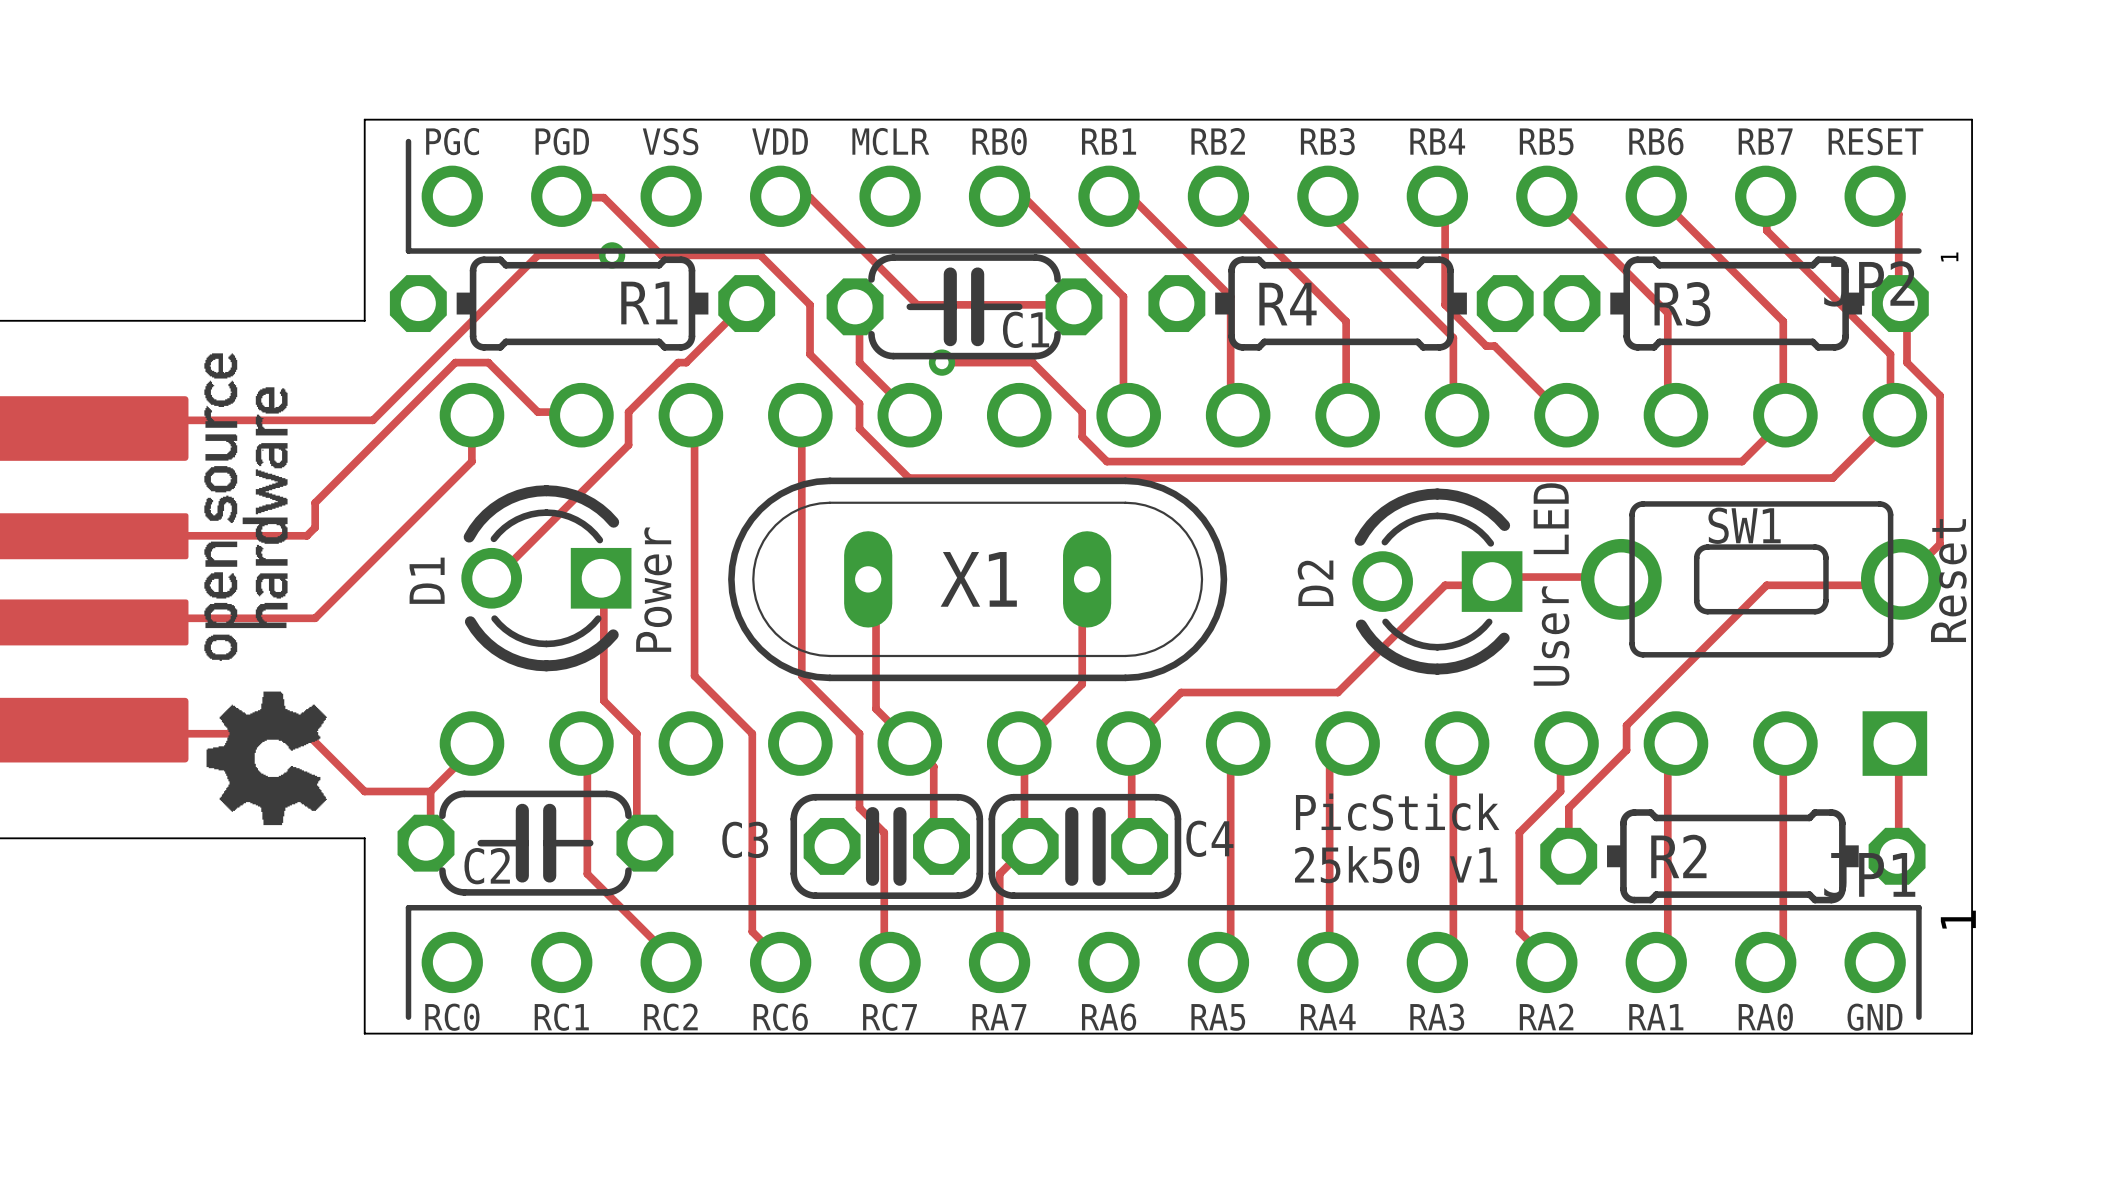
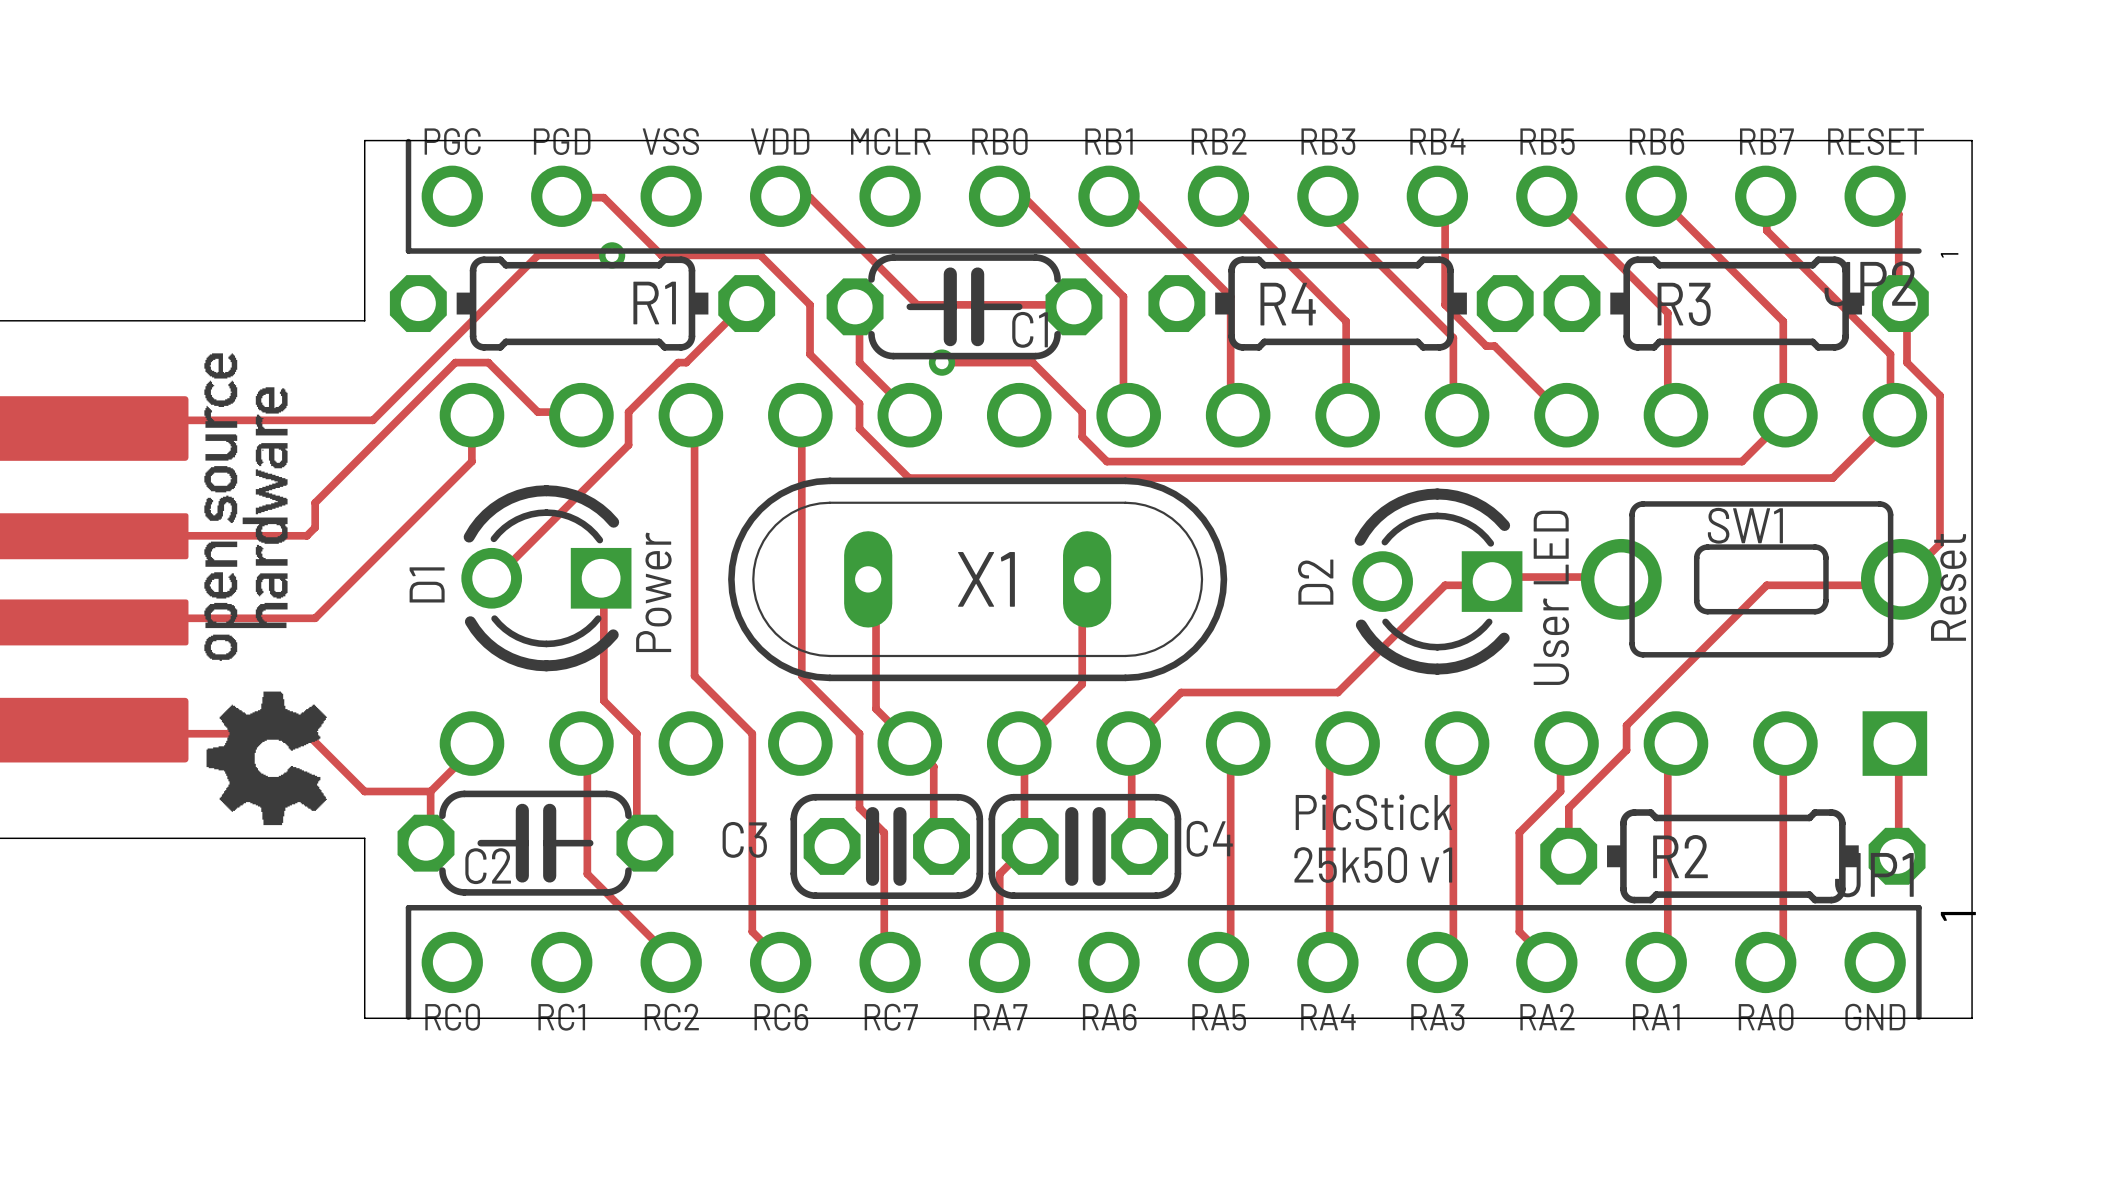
board edge: (364, 140) (364, 119) (1972, 119) (1972, 140) -> (364, 140) (1972, 140)
board edge: (364, 1018) (364, 1033) (1972, 1033) (1972, 1018) -> (364, 1018) (1972, 1018)

